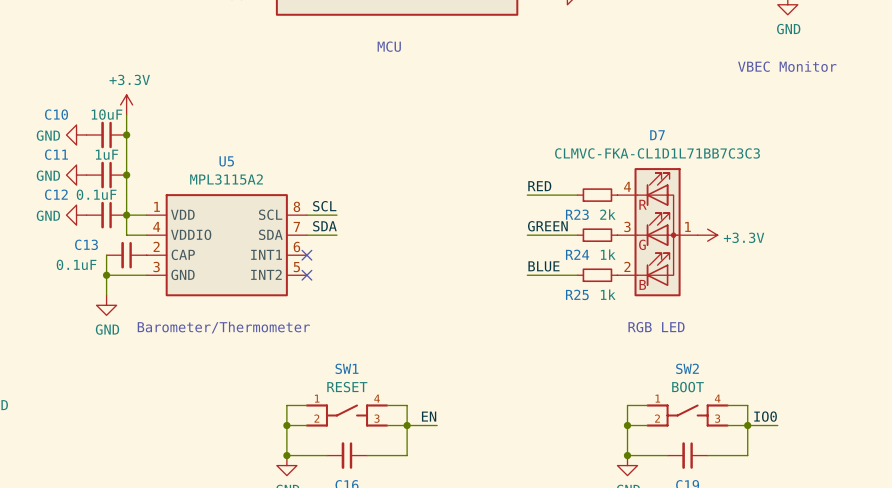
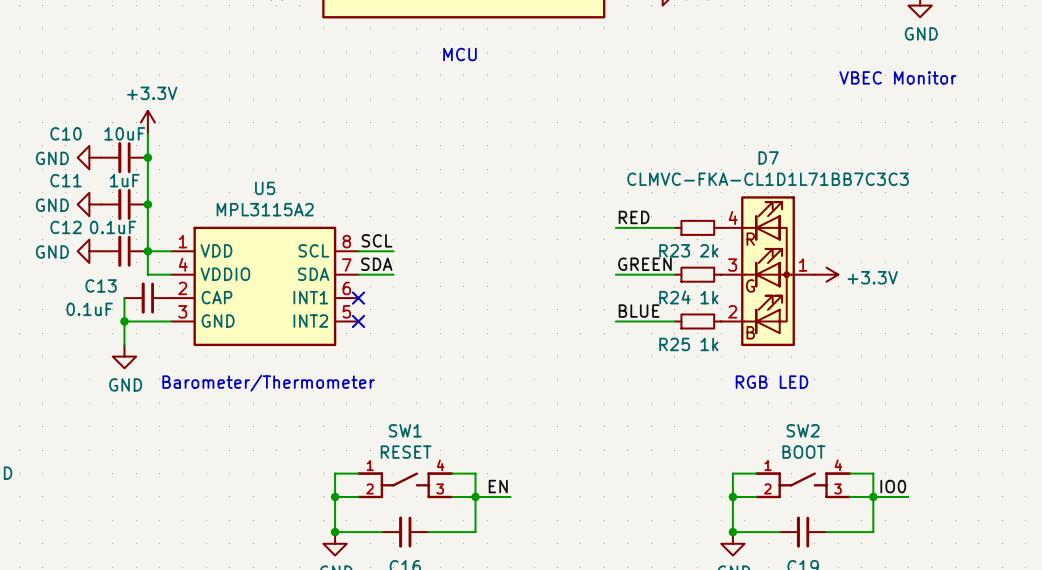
text position: VBEC Monitor (787, 66) -> VBEC Monitor (897, 77)

